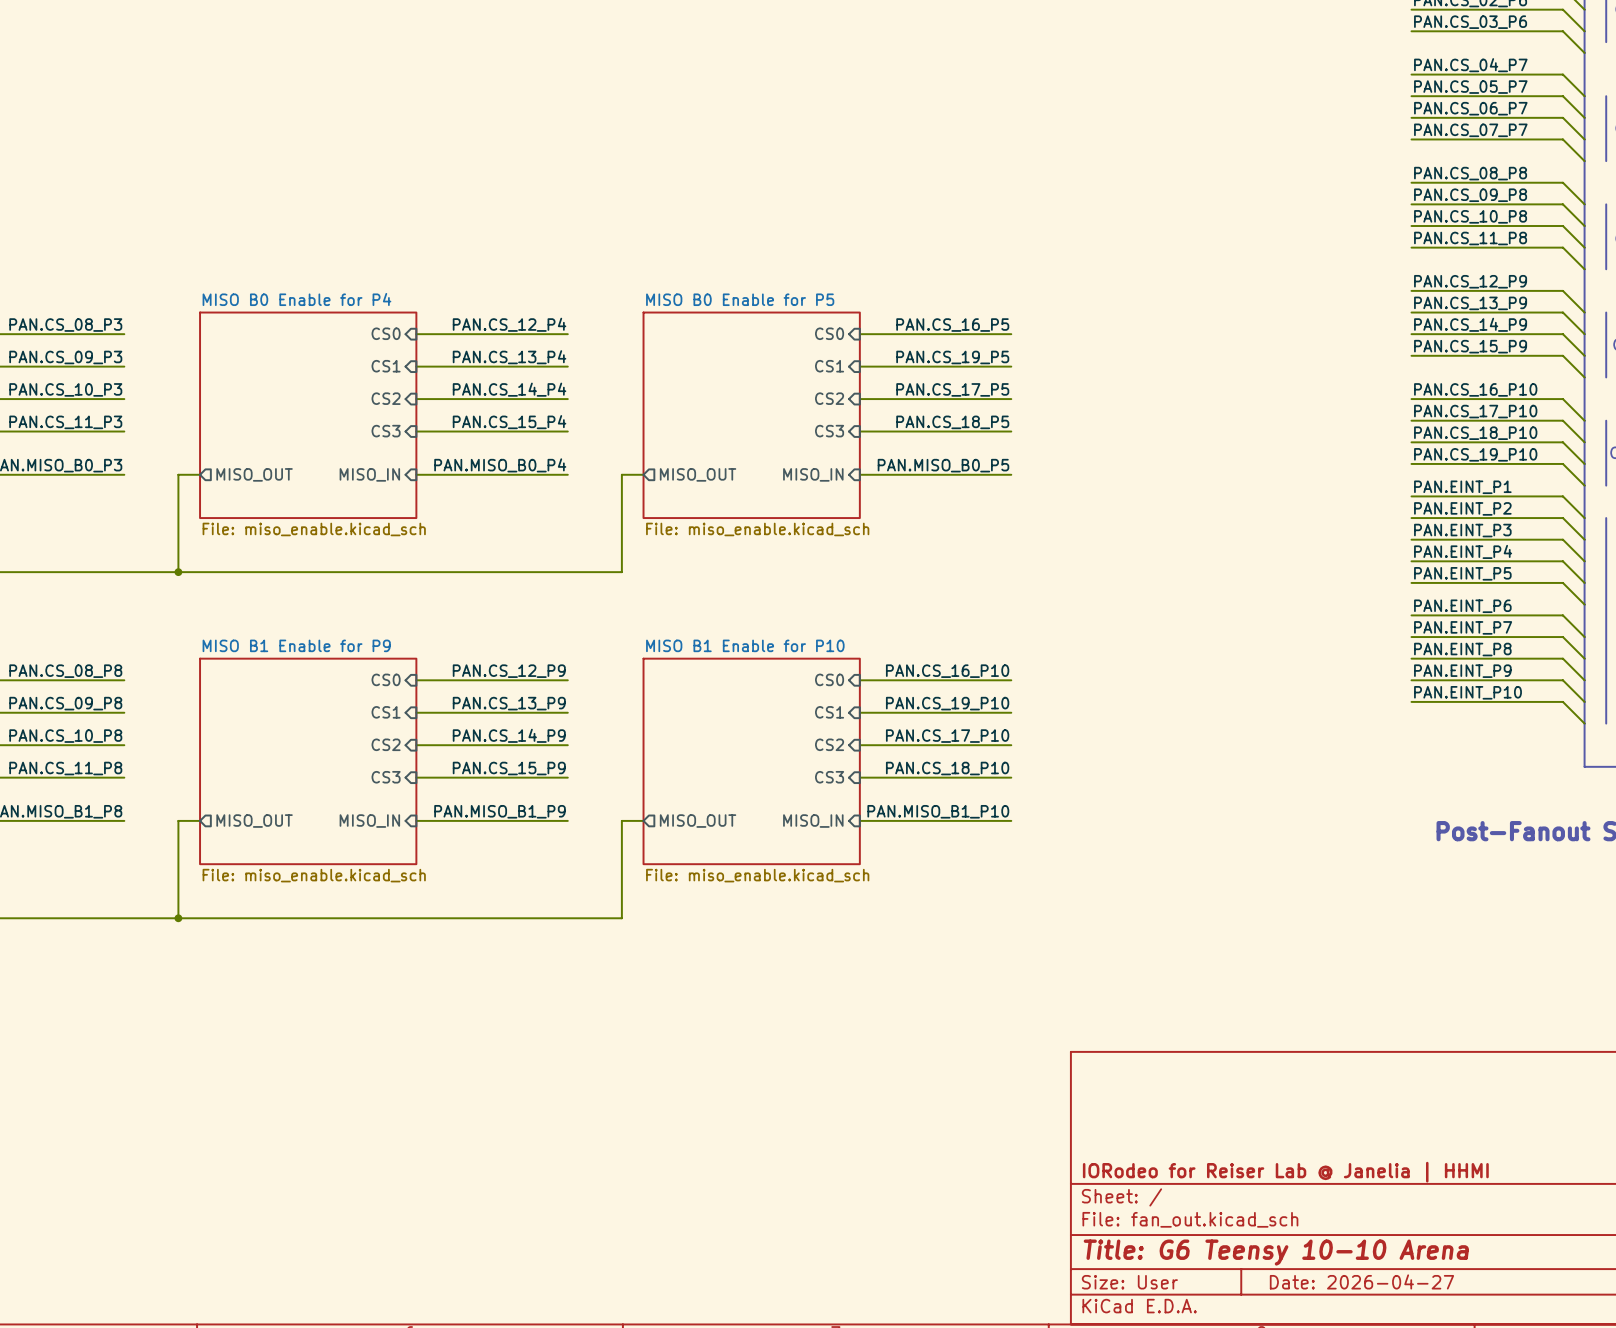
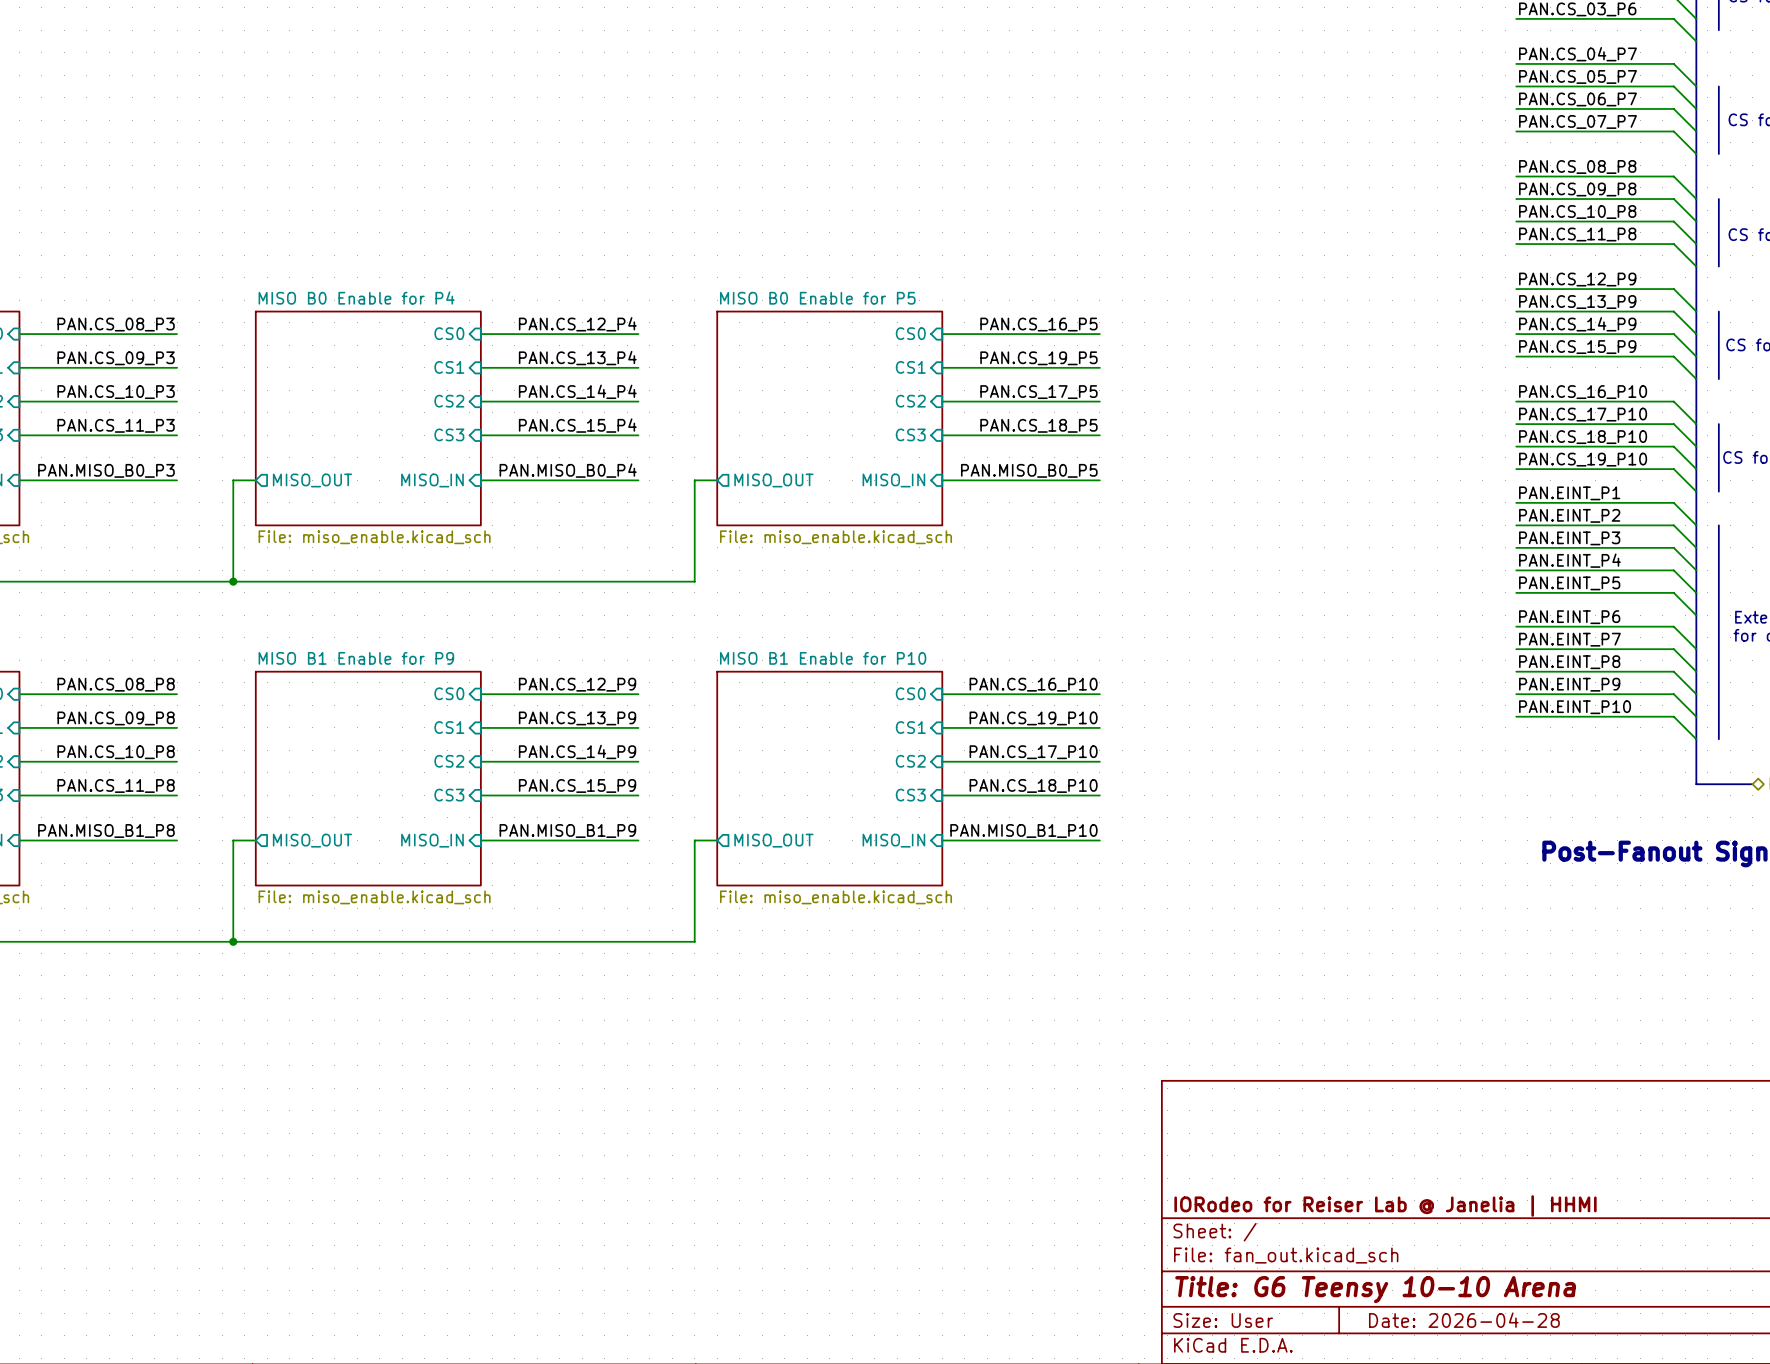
title block: Date: 2026-04-27 (1361, 1281) -> Date: 2026-04-28 (1464, 1320)

